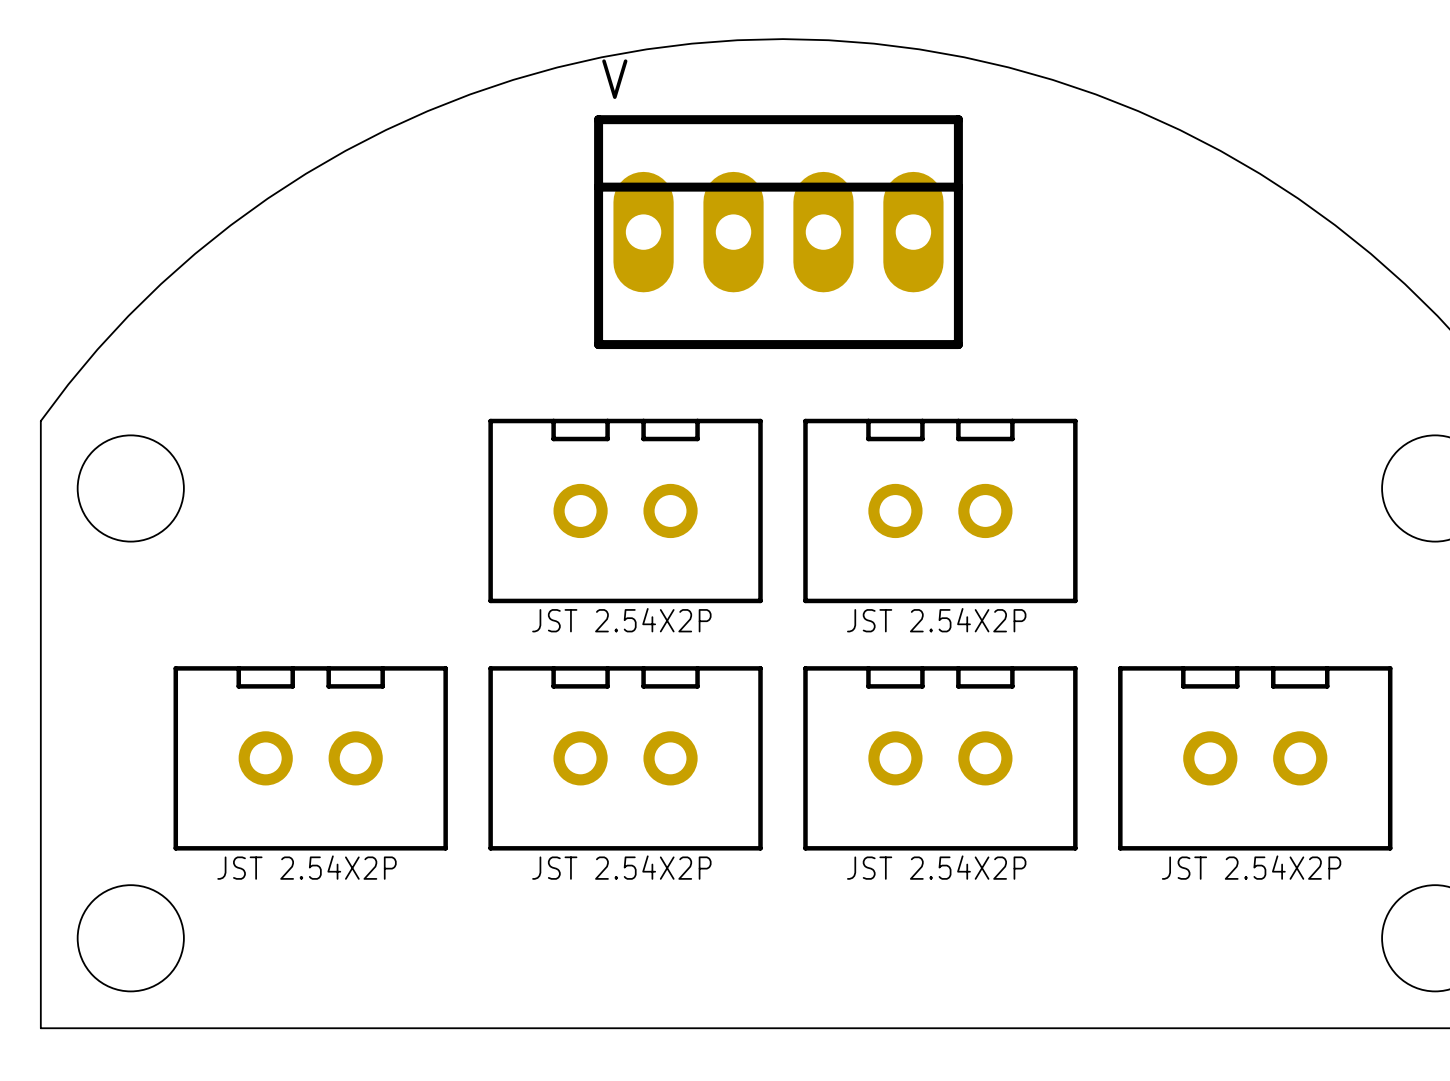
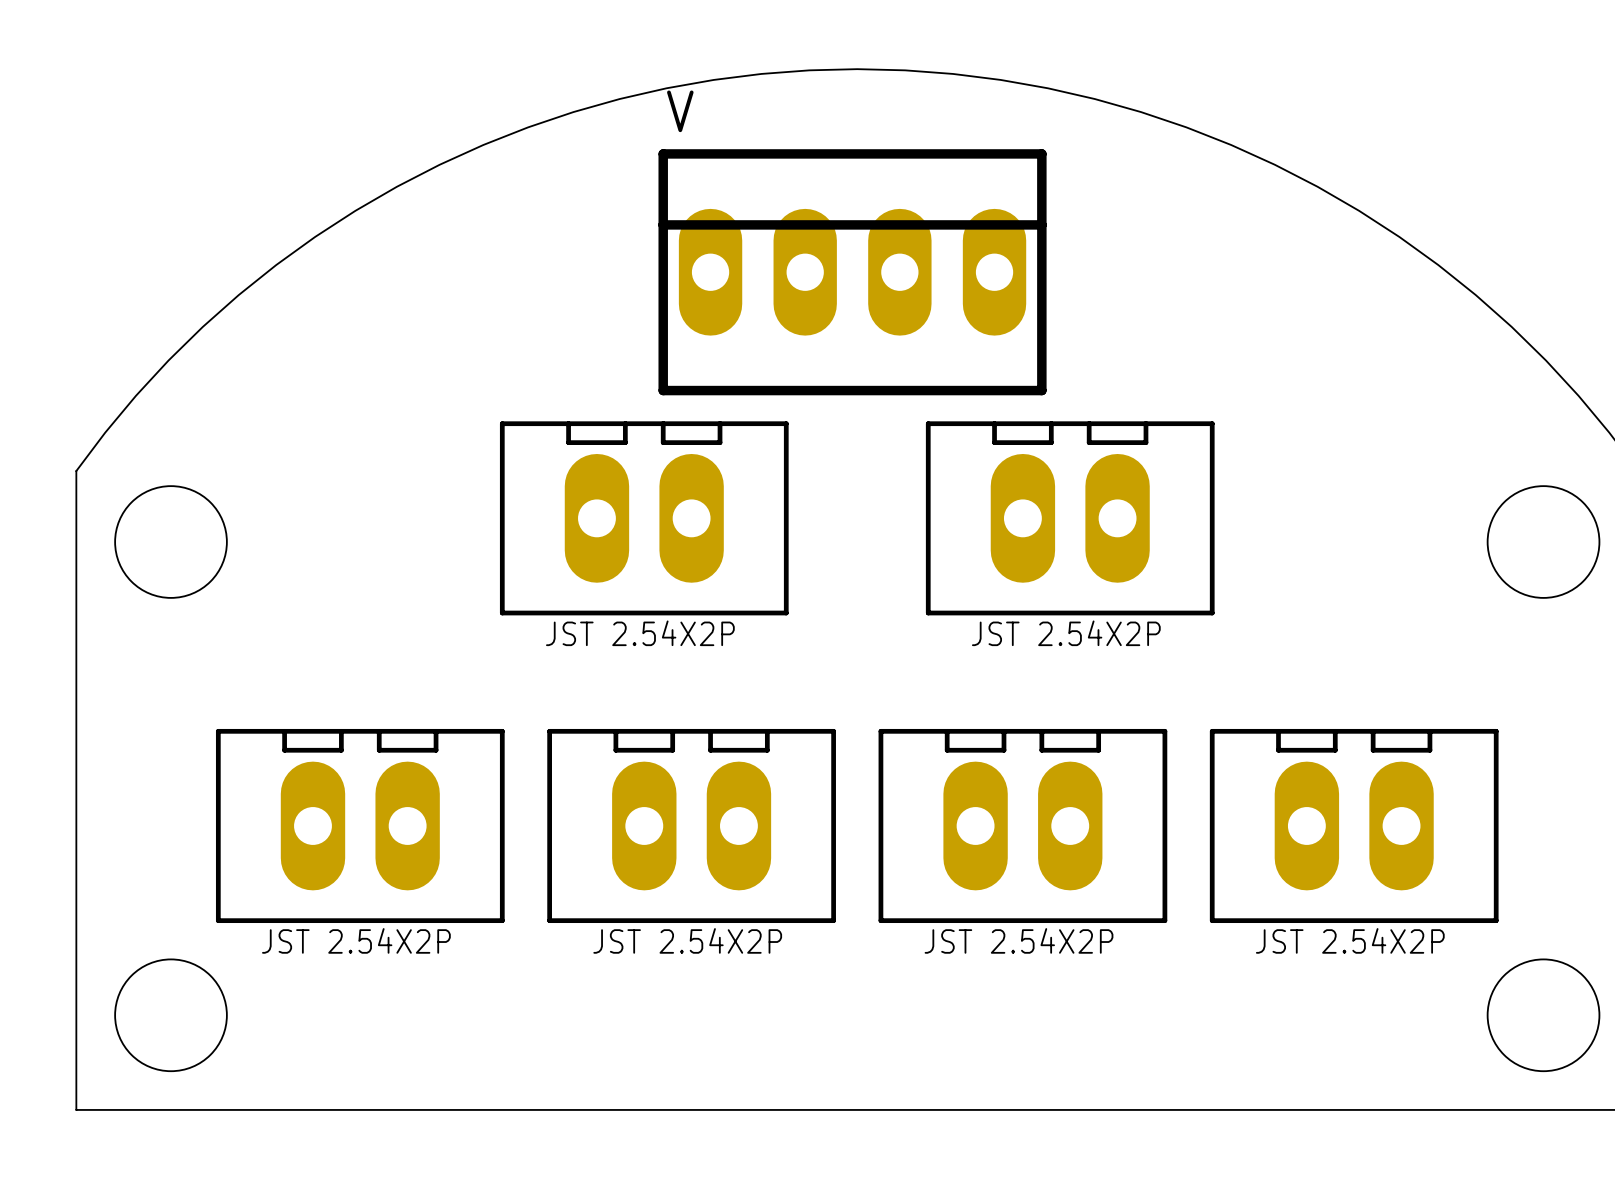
part: none -> (644, 518)
part: none -> (1070, 518)
part: (625, 510) -> none
part: (940, 510) -> none
part footprint: [173, 666, 448, 851] -> [215, 728, 505, 924]
part footprint: [488, 666, 763, 851] -> [547, 728, 836, 924]
part footprint: [803, 666, 1078, 851] -> [878, 728, 1168, 924]
part footprint: [1118, 666, 1393, 851] -> [1209, 728, 1499, 924]

